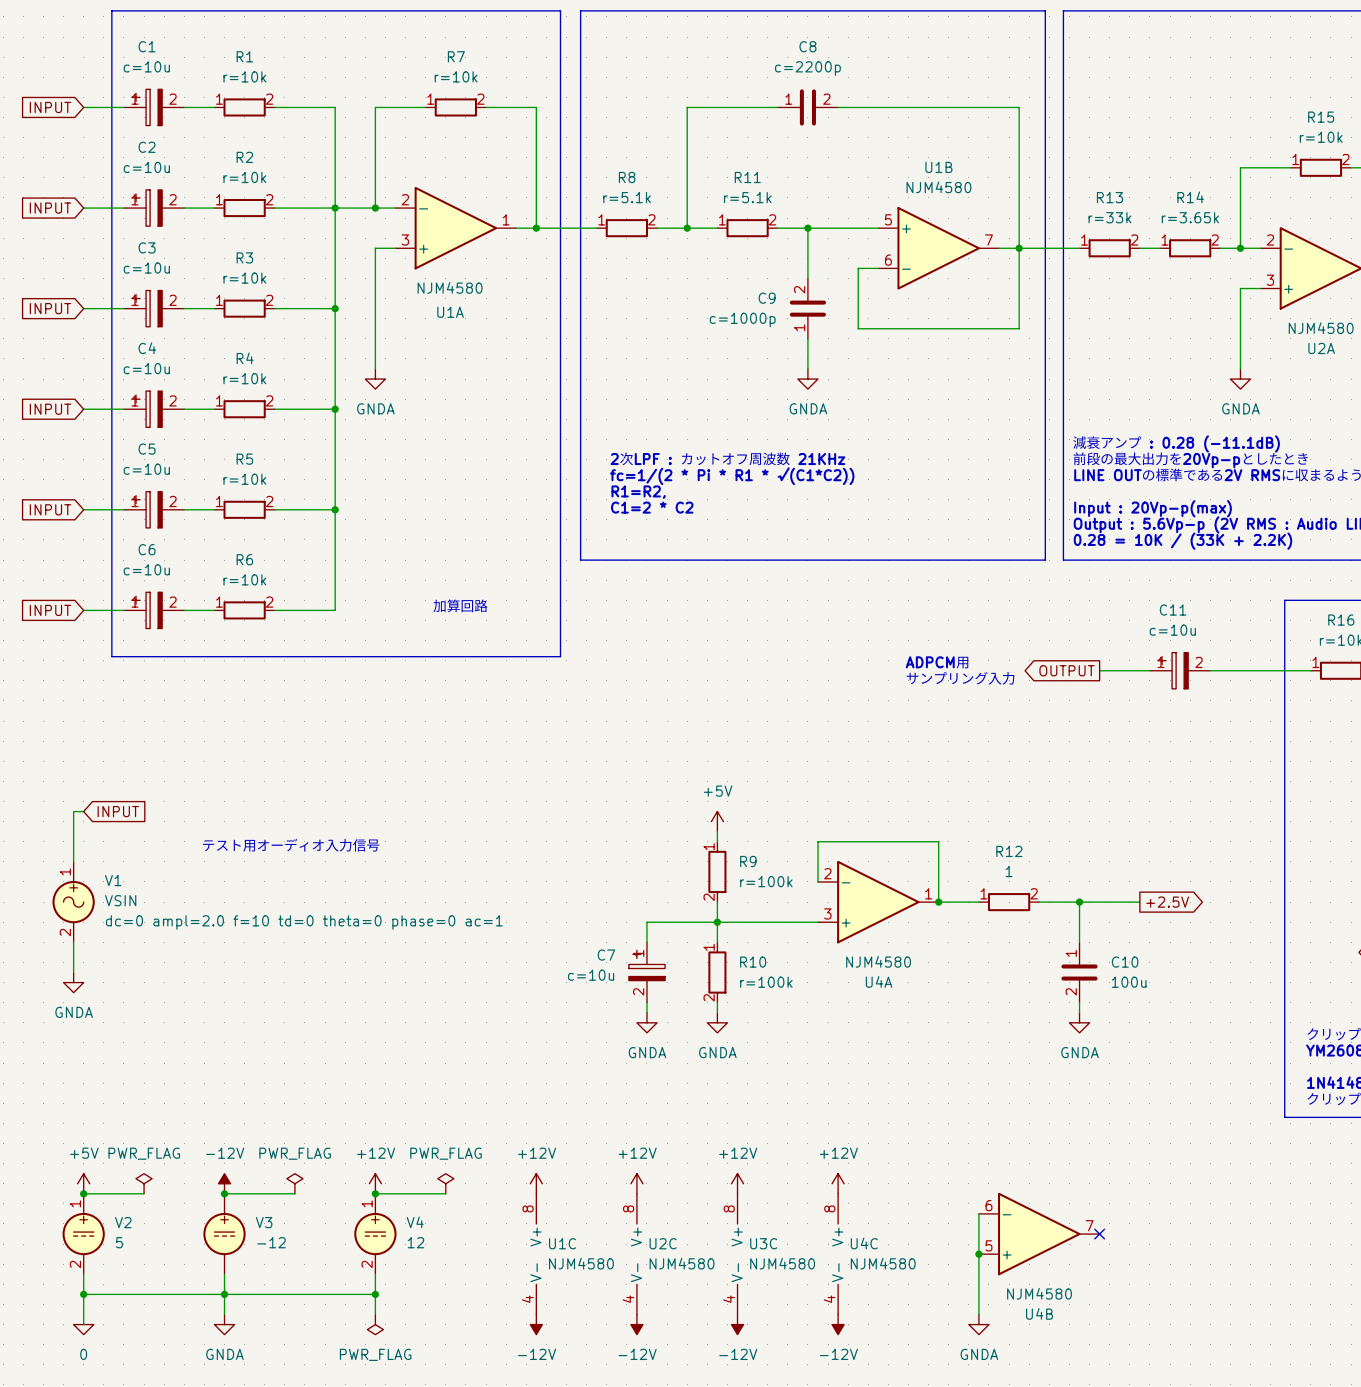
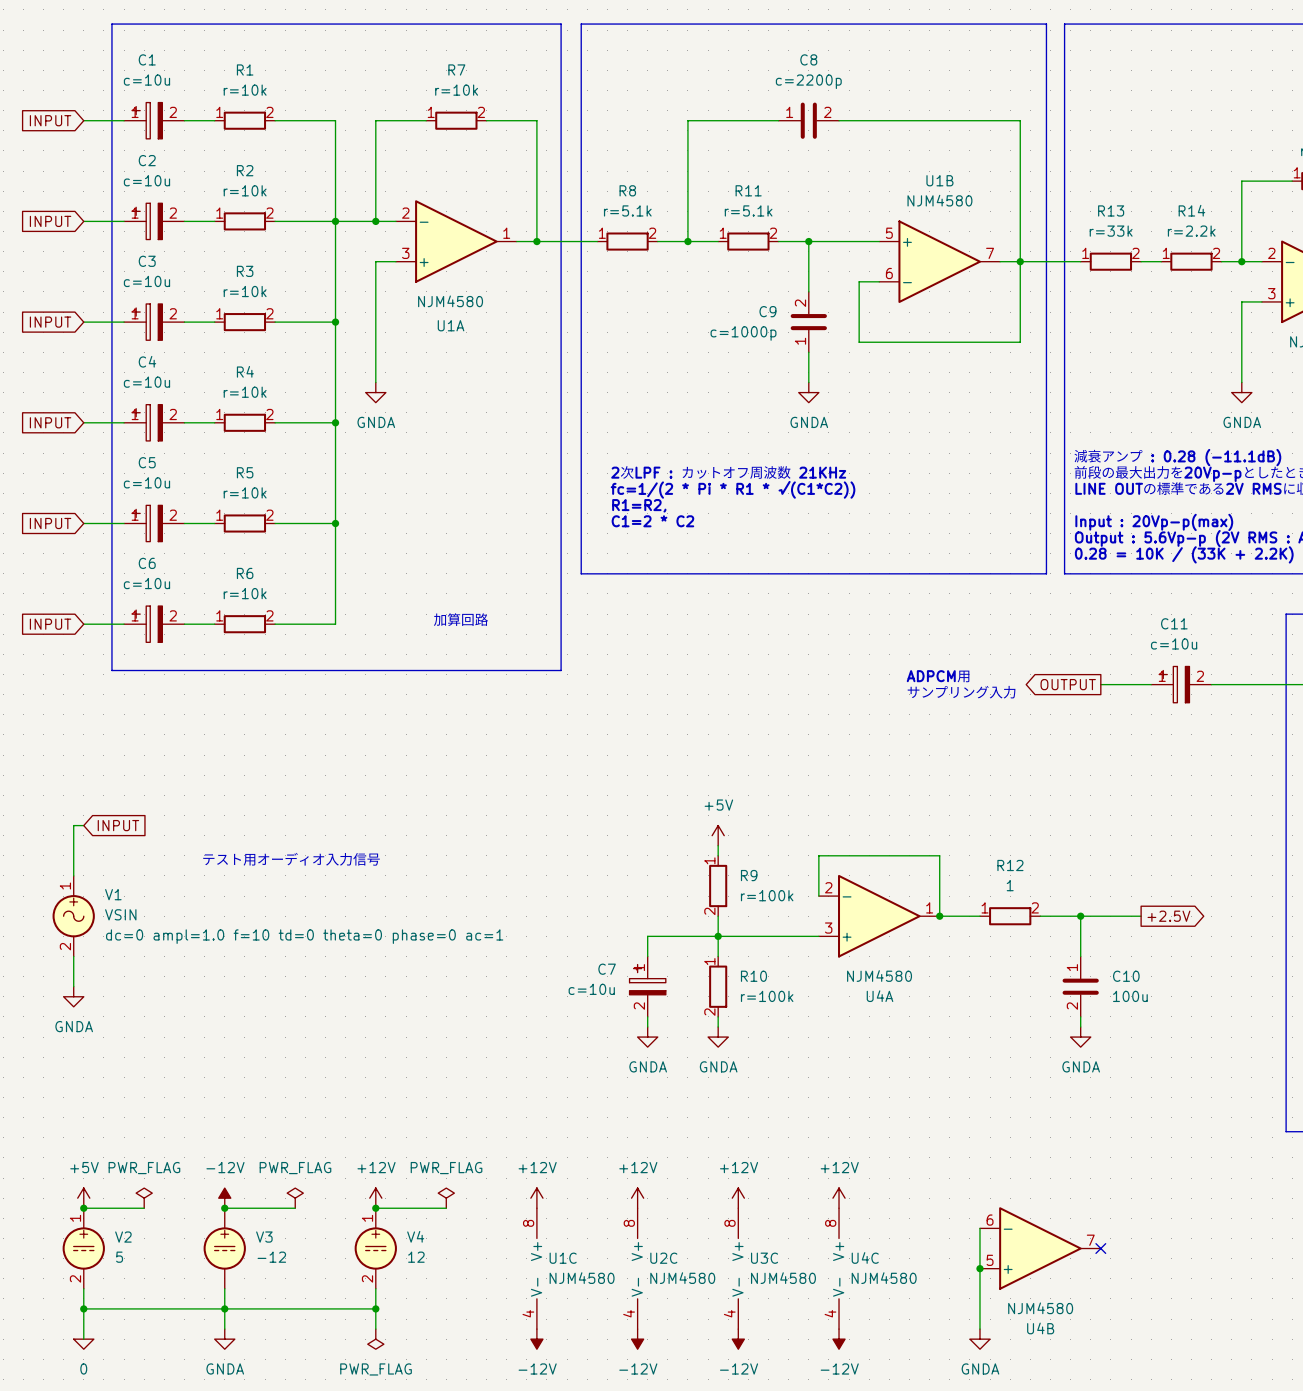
R14 value: r=3.65k (1190, 217) -> r=2.2k (1191, 231)
V1 text: dc=0 ampl=2.0 f=10 td=0 theta=0 phase=0 ac=1 (304, 922) -> dc=0 ampl=1.0 f=10 td=0 theta=0 phase=0 ac=1 (304, 936)

